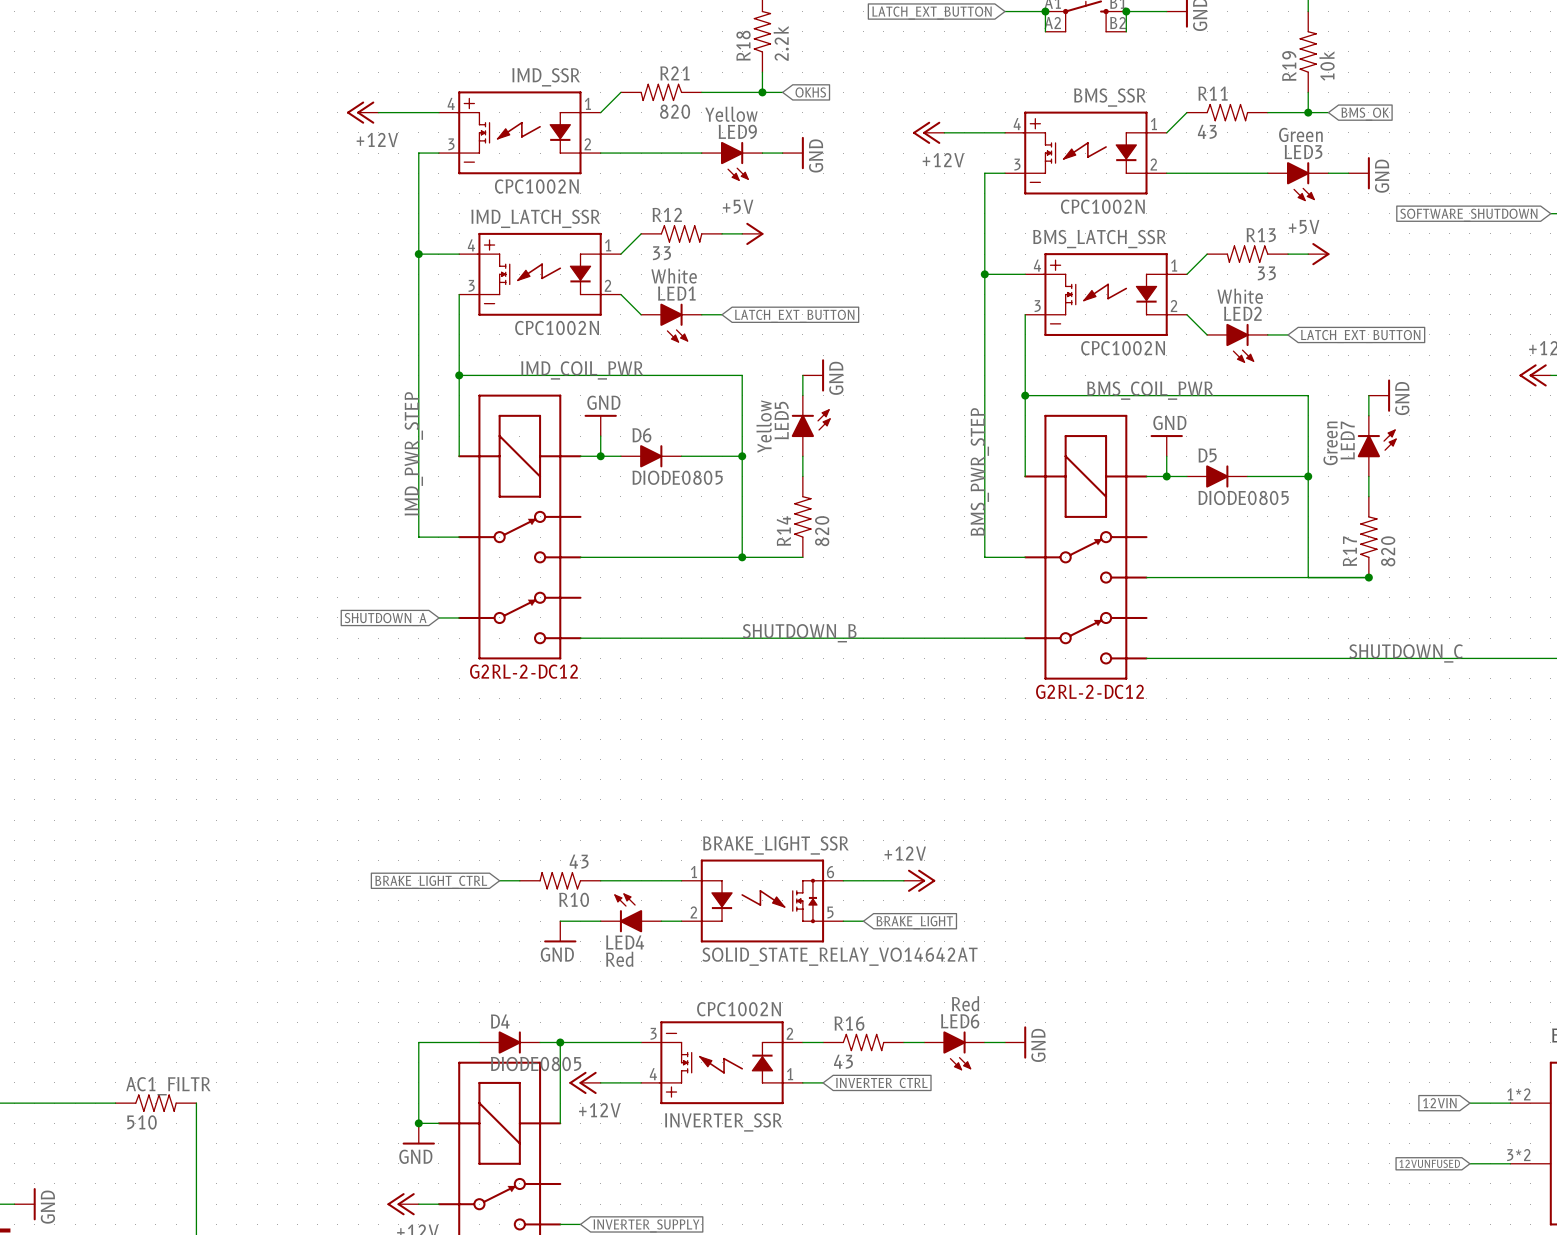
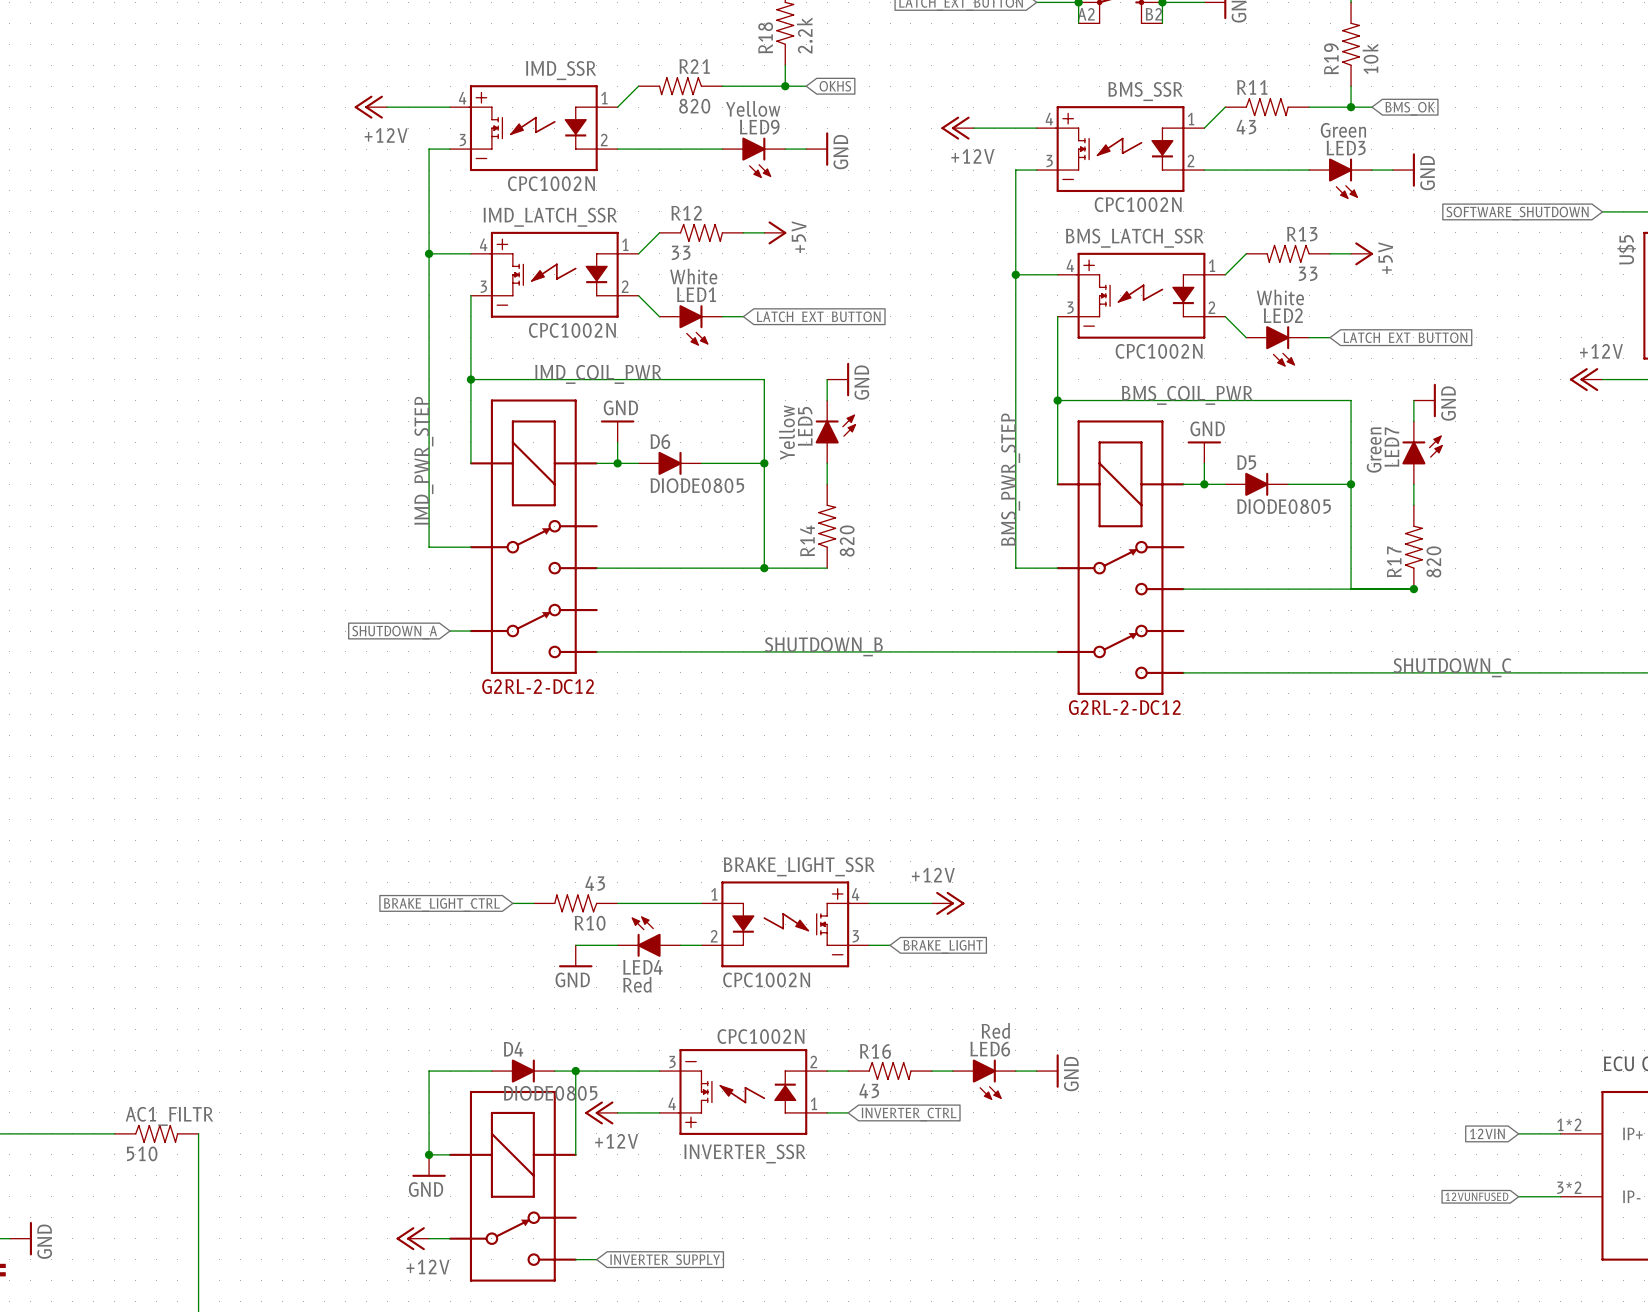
power symbol text rotation: 0° (738, 206) -> 90° counterclockwise (798, 237)
power symbol text rotation: 0° (1304, 226) -> 90° counterclockwise (1385, 258)
BRAKE_LIGHT_SSR symbol: [681, 859, 844, 943] -> [701, 881, 870, 968]
BRAKE_LIGHT_SSR value: SOLID_STATE_RELAY_VO14642AT (840, 956) -> CPC1002N (766, 979)

